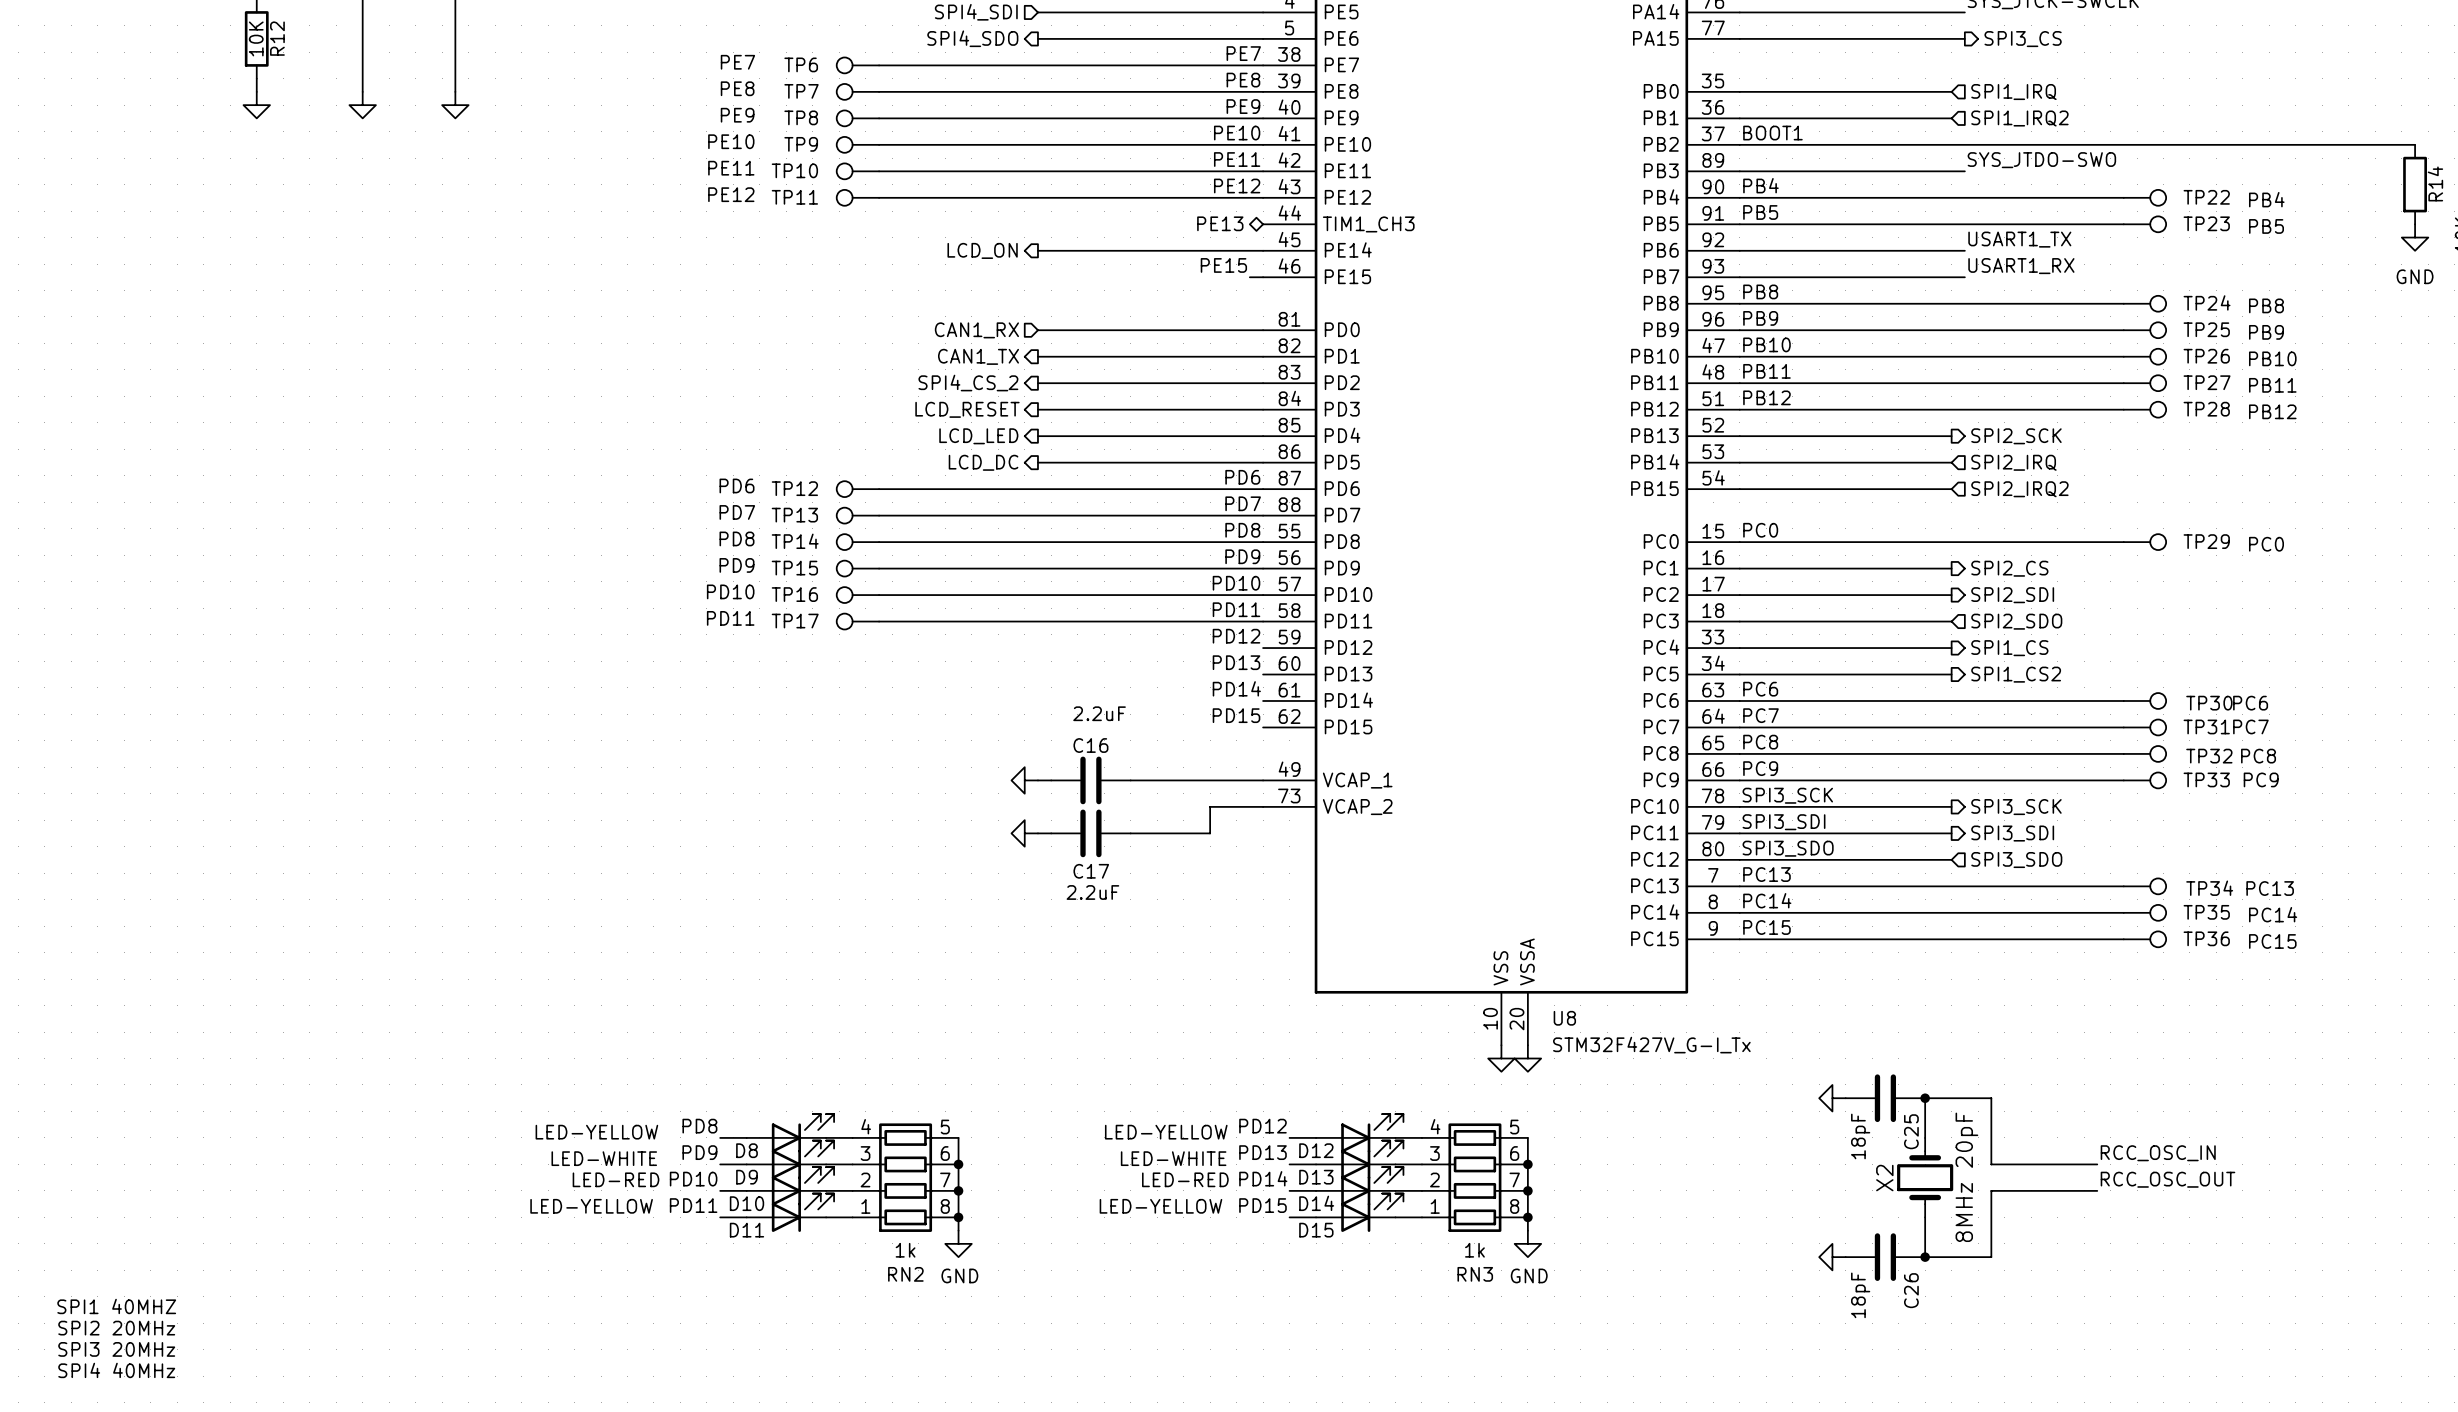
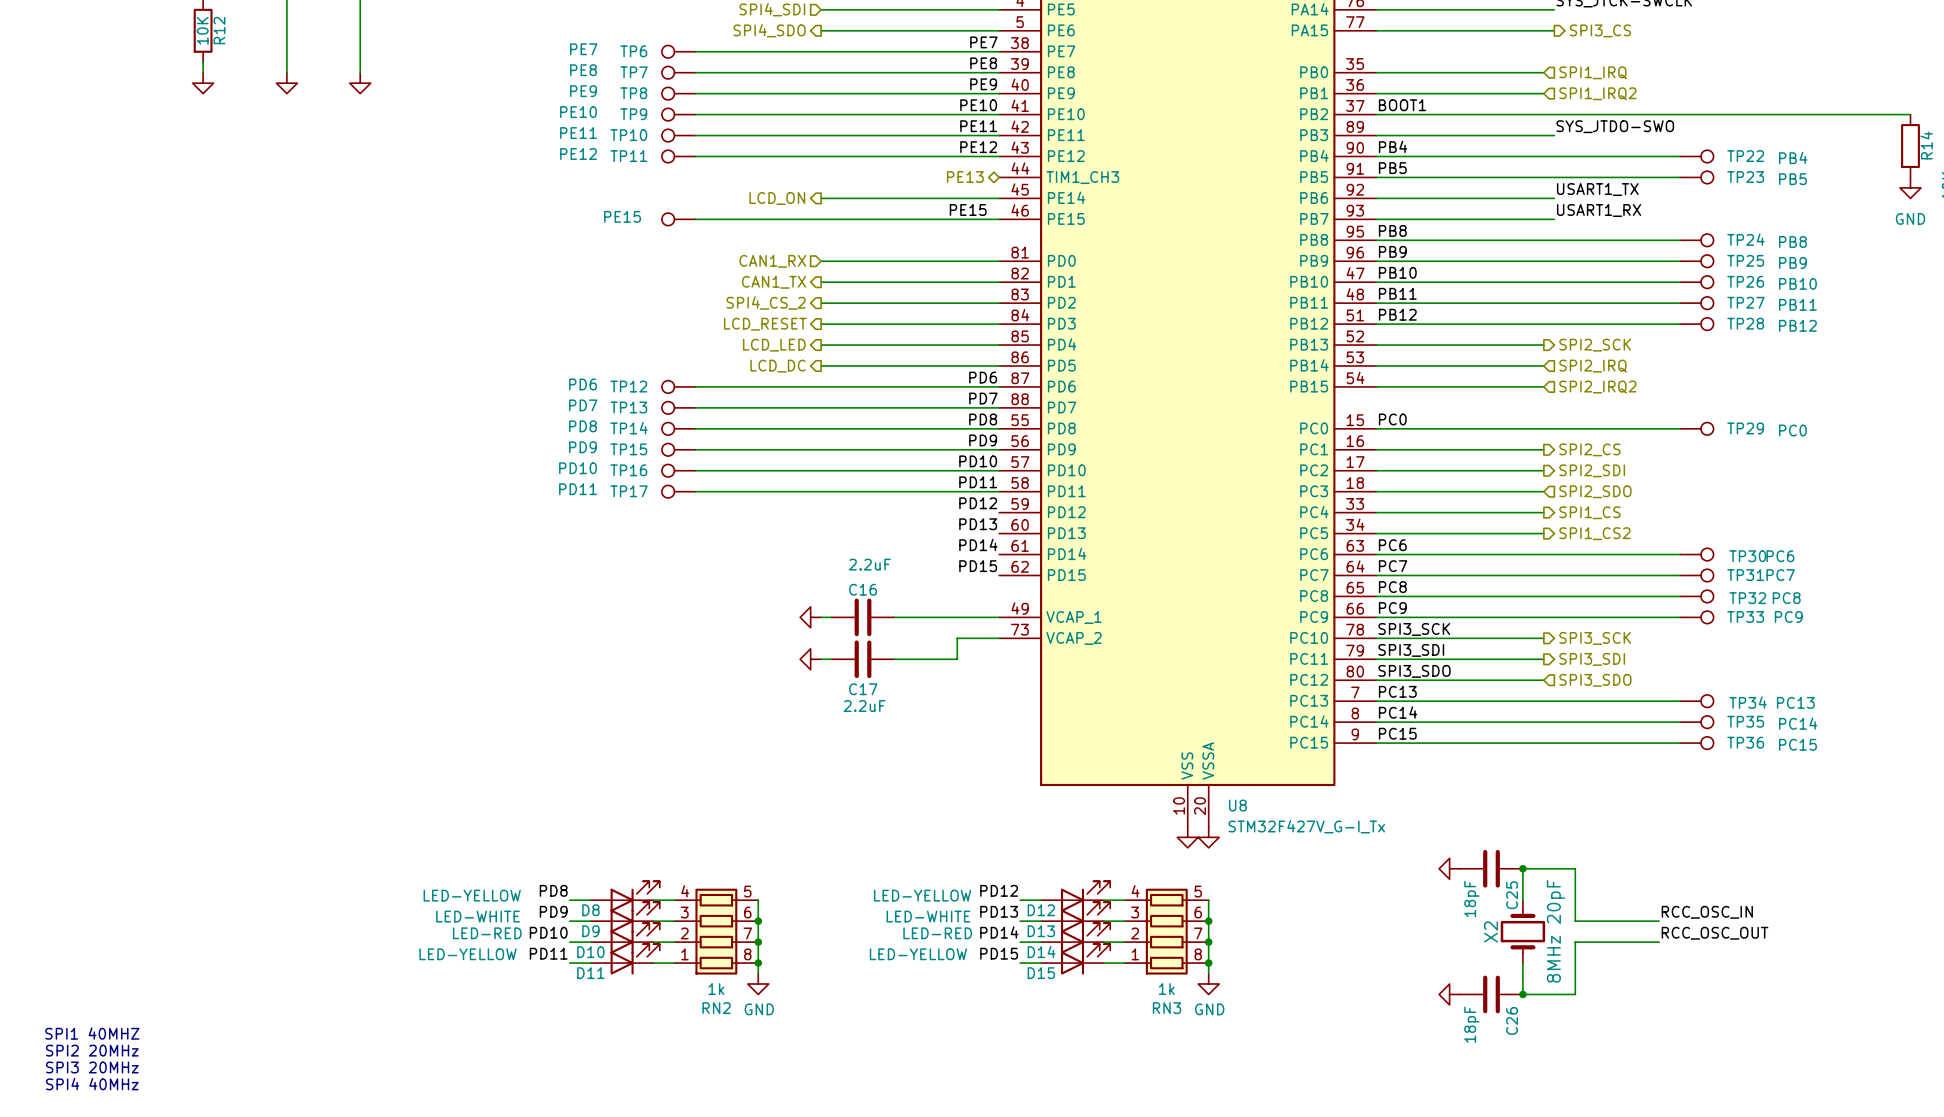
part: none -> PE15 (678, 219)
wire: none -> (695, 219) (988, 219)

